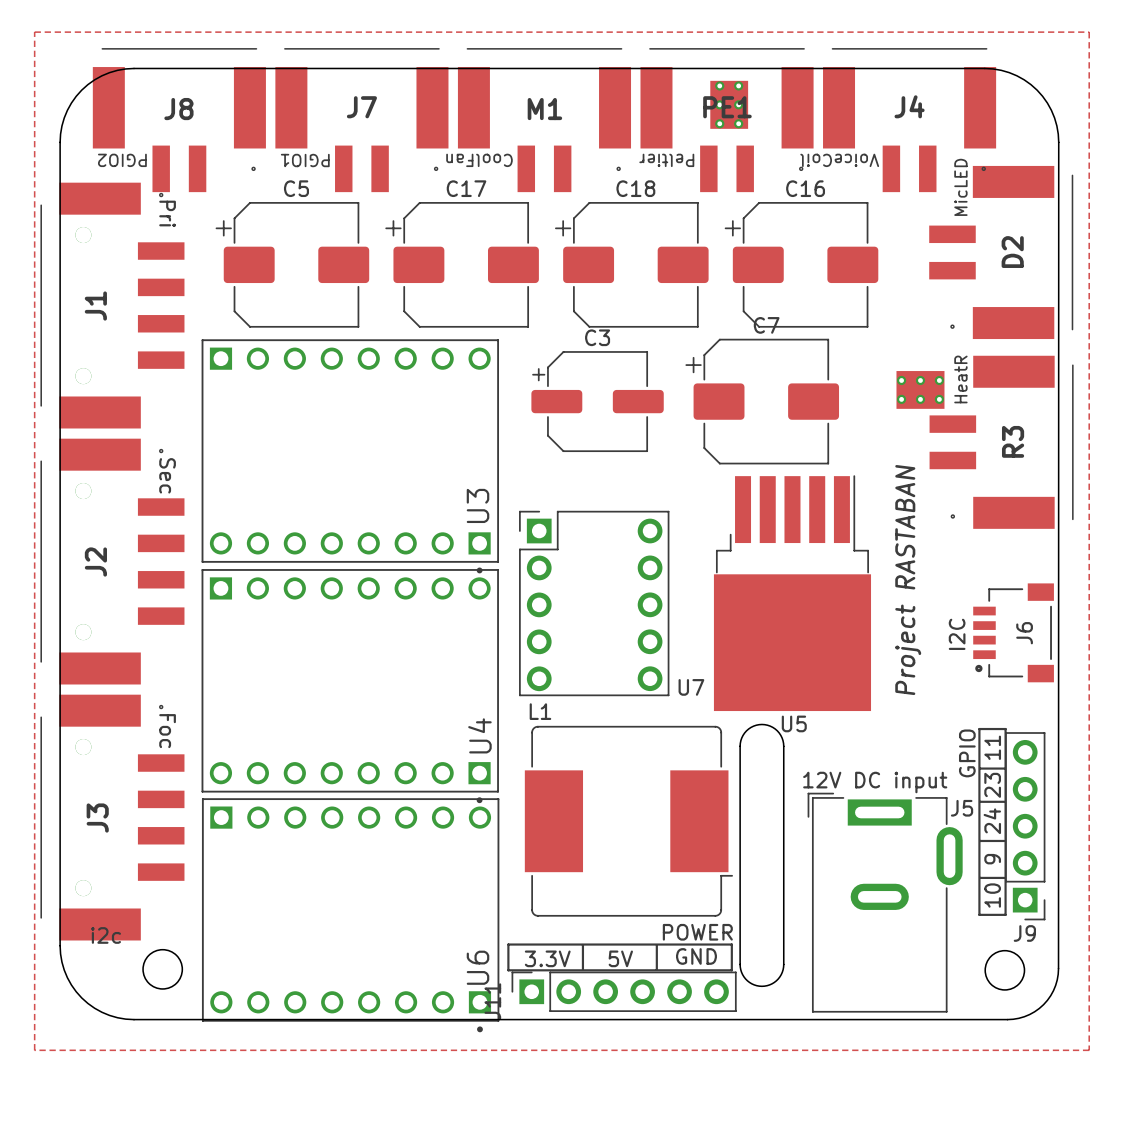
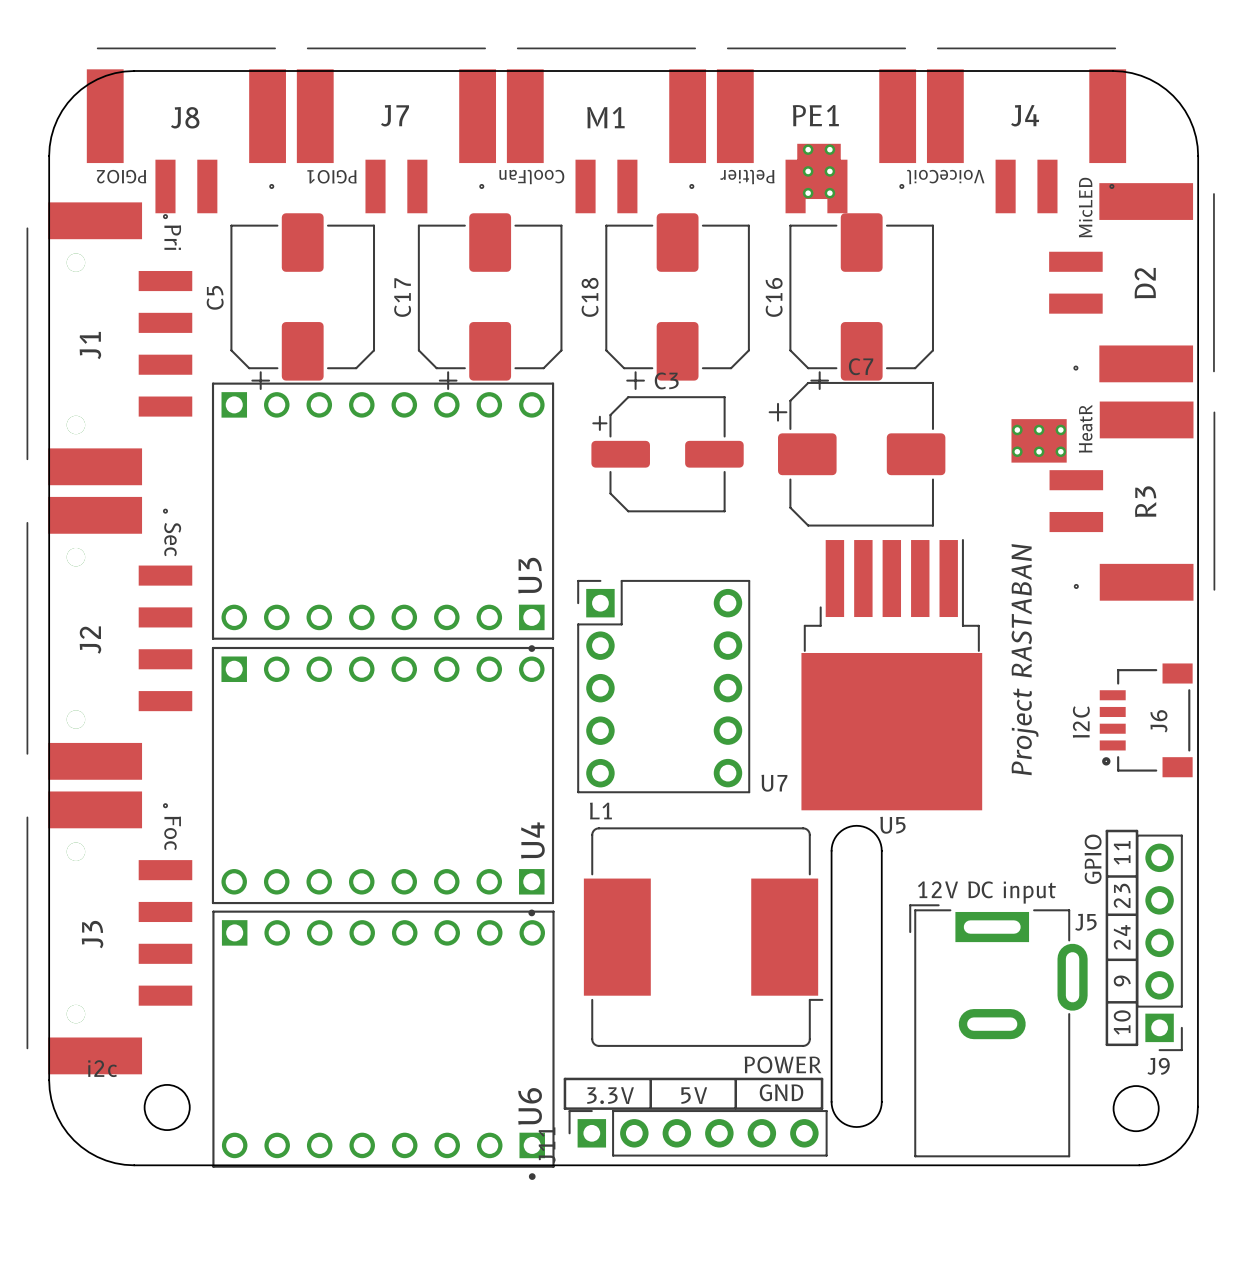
zone outline: (34, 32) (34, 1050) (1089, 1050) (1089, 32) (34, 32) -> none
part position: (729, 104) -> (819, 171)
C5 rotation: 0° (292, 264) -> 90° counterclockwise (302, 301)
C17 rotation: 0° (462, 264) -> 90° counterclockwise (490, 301)
C18 rotation: 0° (631, 264) -> 90° counterclockwise (677, 301)
C16 rotation: 0° (801, 264) -> 90° counterclockwise (861, 301)

